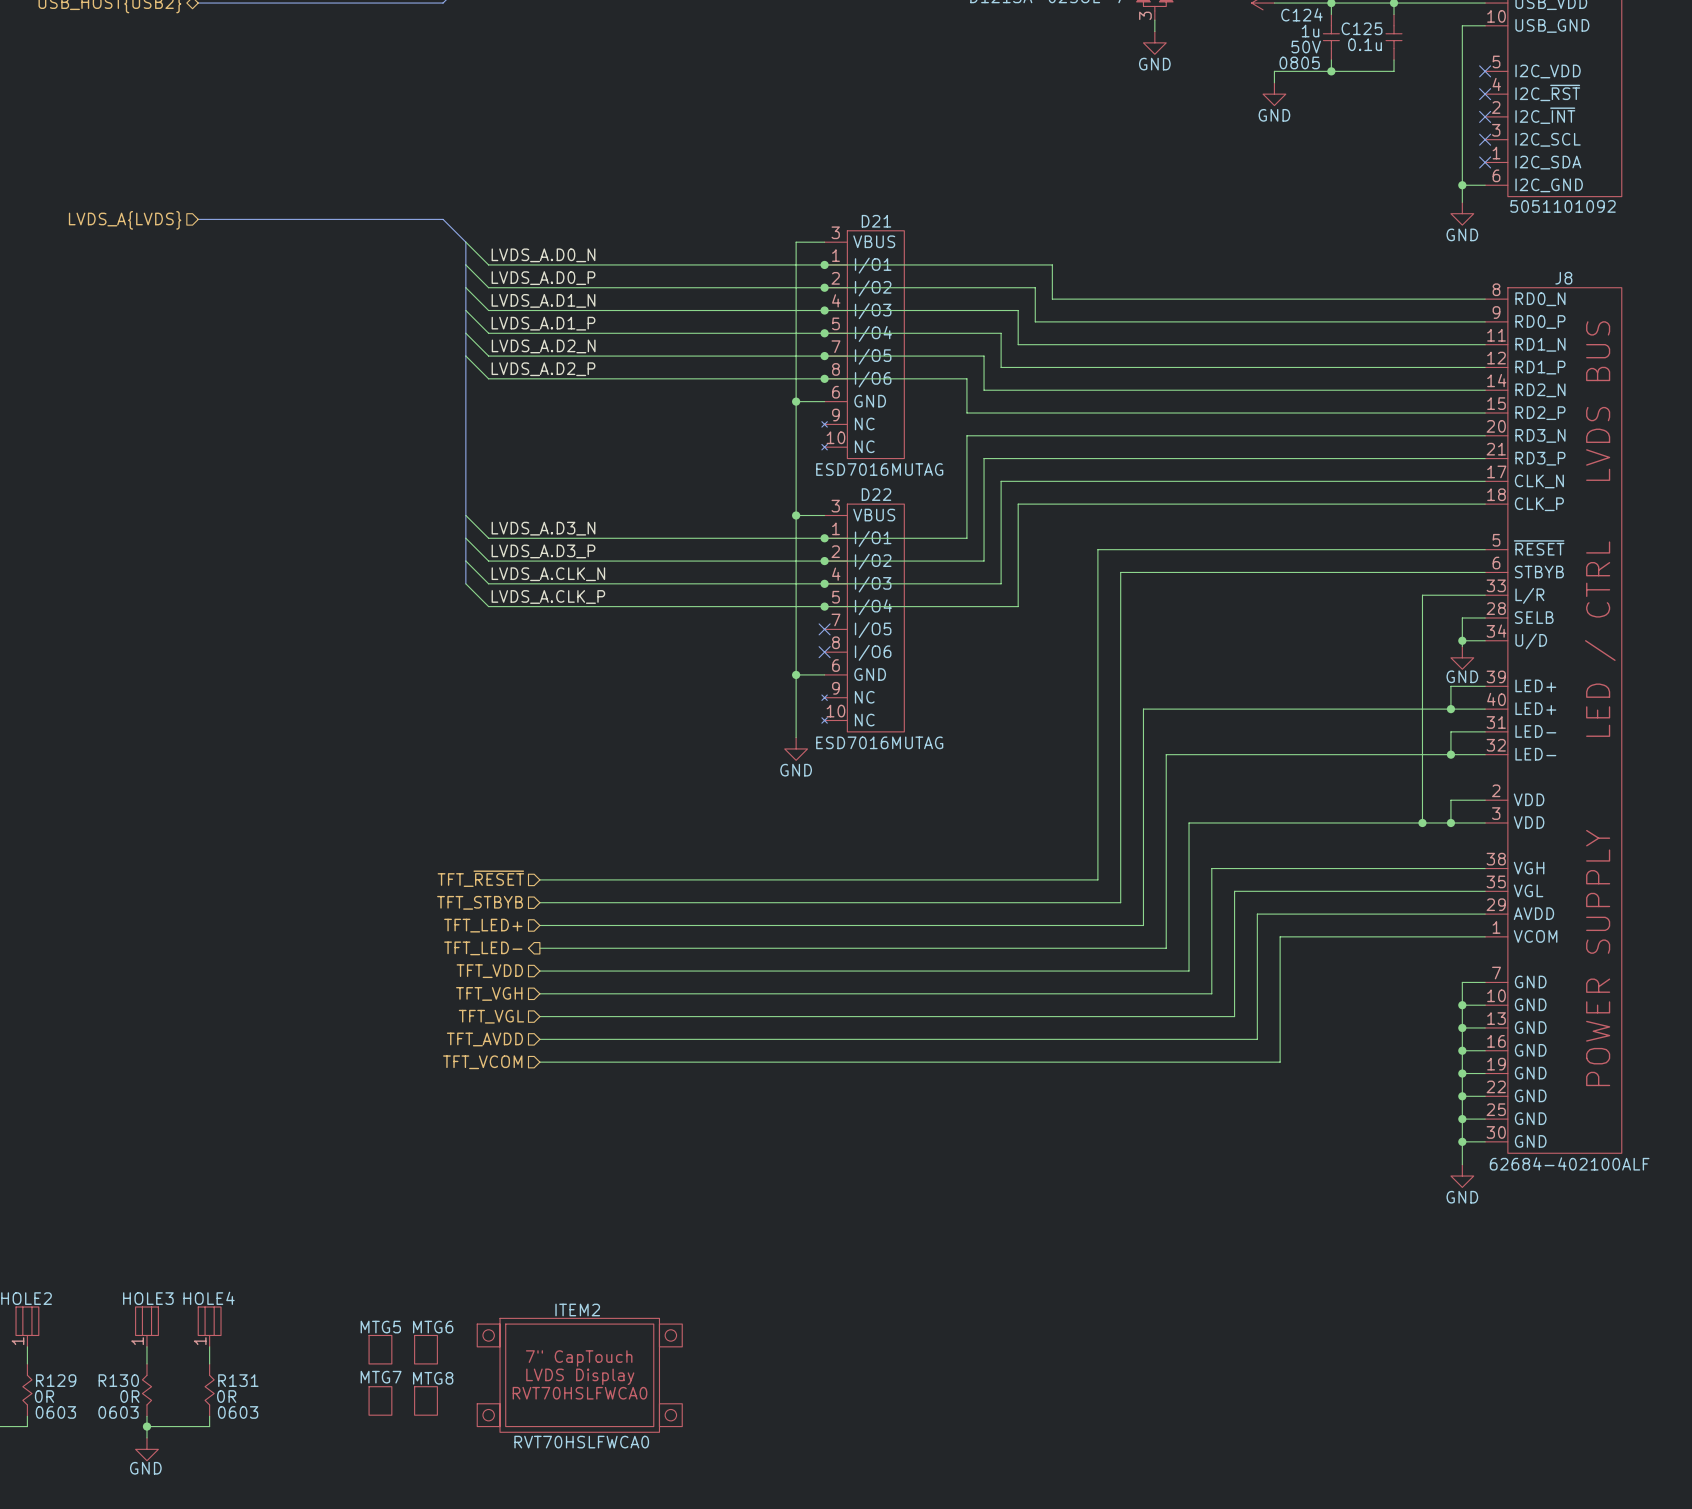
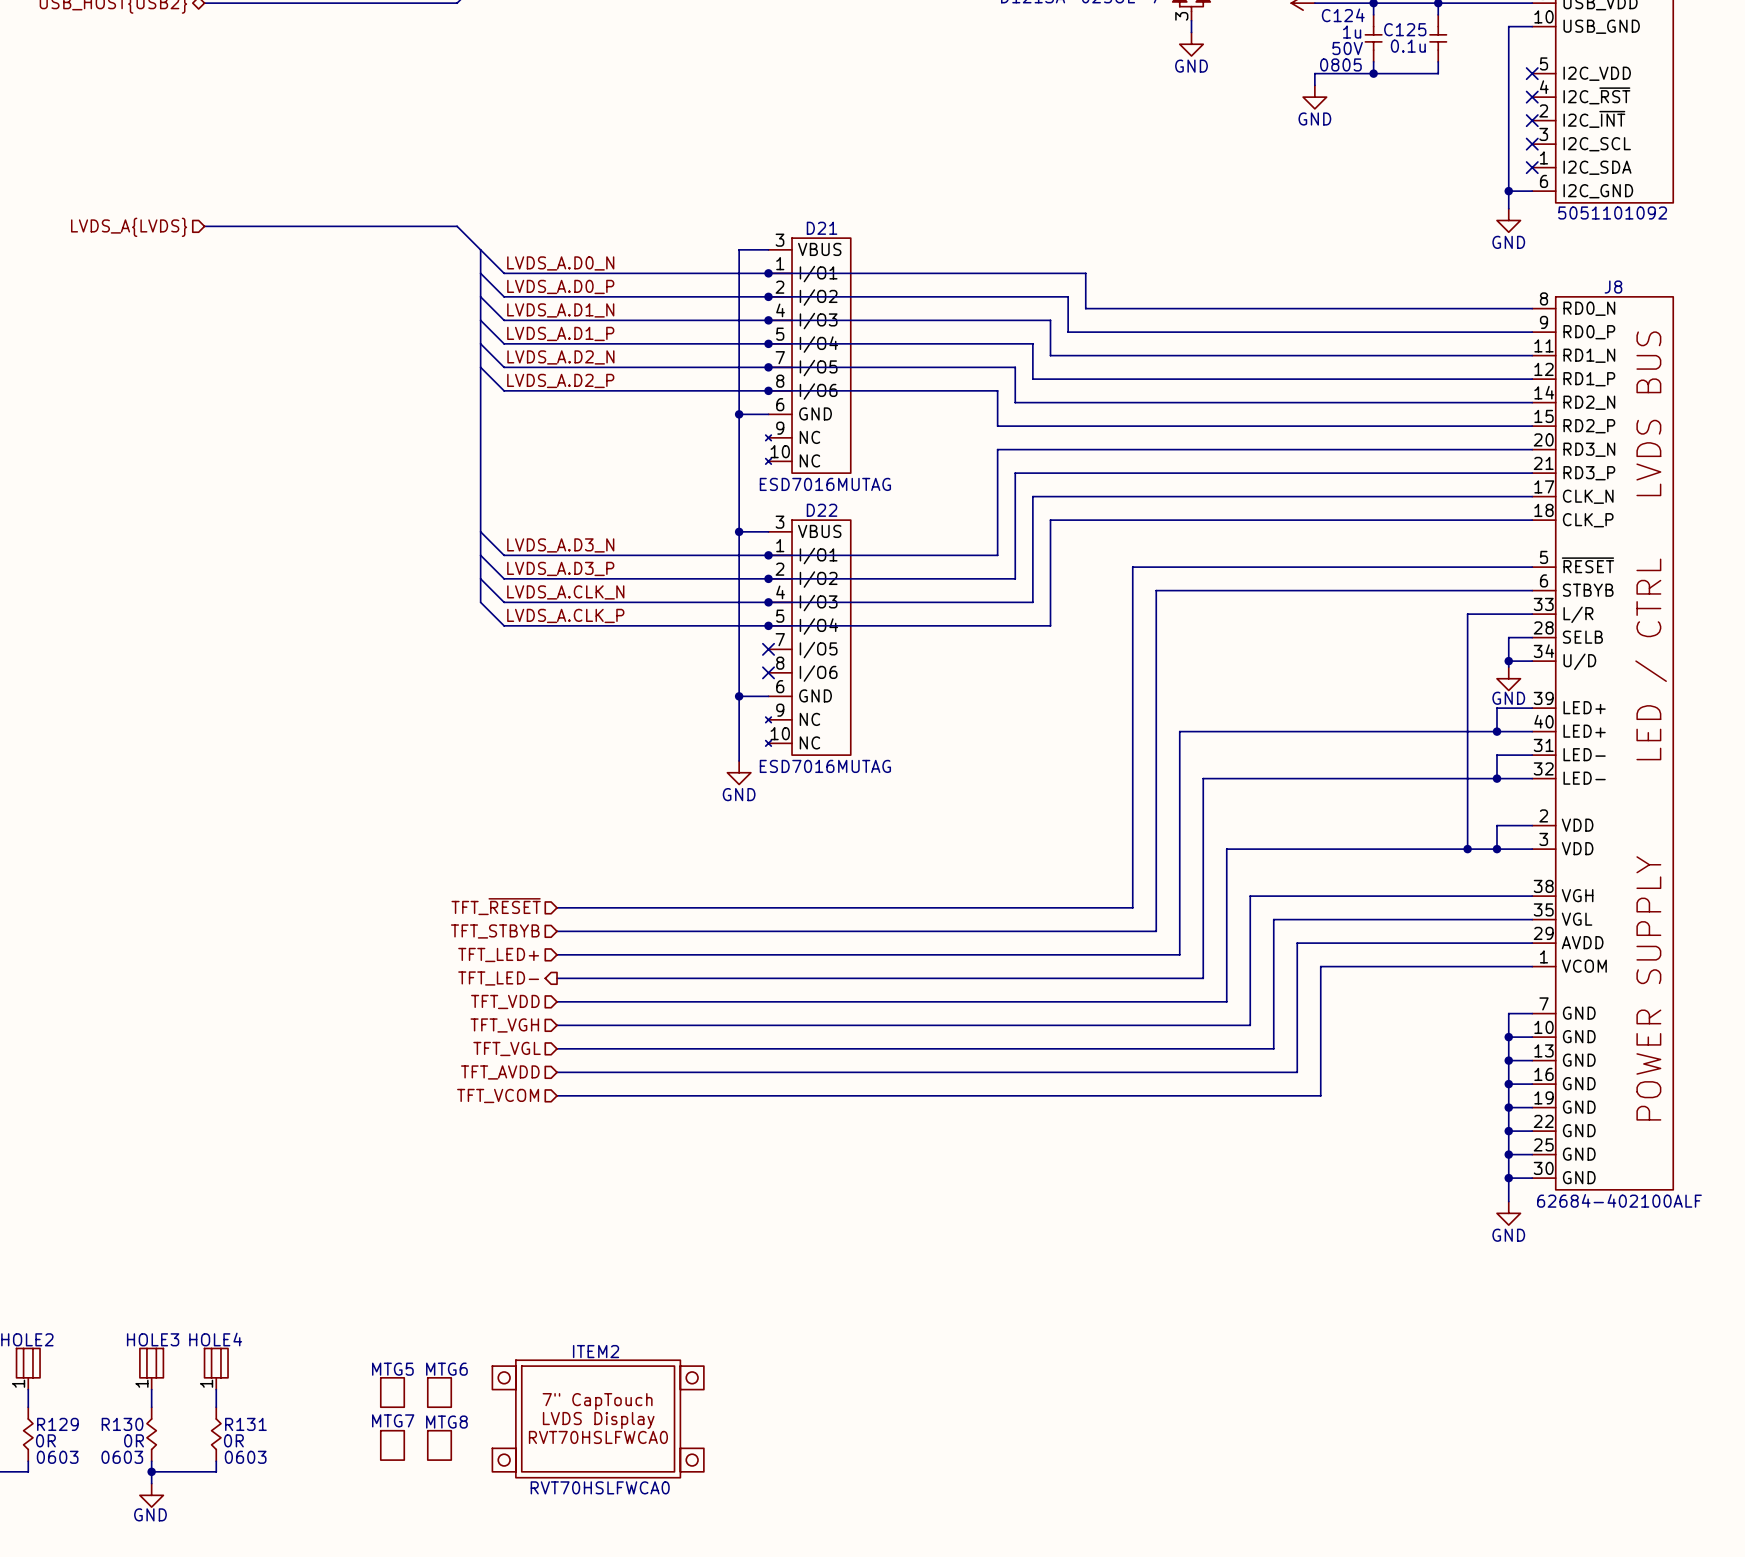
wire: (824, 242) (796, 242) (796, 737) -> (768, 249) (739, 249) (739, 760)
junction: none -> (768, 273)
junction: (824, 264) -> none
junction: none -> (768, 296)
junction: (824, 287) -> none
junction: none -> (768, 320)
junction: (824, 310) -> none
junction: none -> (768, 343)
junction: (824, 333) -> none
D21 position: (863, 344) -> (808, 355)
junction: none -> (768, 367)
junction: (824, 356) -> none
junction: none -> (768, 390)
junction: (824, 378) -> none
junction: none -> (739, 414)
wire: (796, 401) (824, 401) -> (739, 414) (768, 414)
junction: (796, 401) -> none
junction: none -> (739, 531)
wire: (796, 515) (824, 515) -> (739, 531) (768, 531)
junction: (796, 515) -> none
junction: none -> (768, 555)
junction: (824, 538) -> none
junction: none -> (768, 578)
junction: (824, 561) -> none
junction: none -> (768, 602)
junction: (824, 583) -> none
junction: none -> (768, 625)
junction: (824, 606) -> none
D22 position: (863, 618) -> (808, 637)
no-connect mark: none -> (768, 649)
no-connect mark: (824, 629) -> none
no-connect mark: none -> (768, 672)
no-connect mark: (824, 652) -> none
junction: none -> (739, 696)
wire: (796, 674) (824, 674) -> (739, 696) (768, 696)
junction: (796, 674) -> none
power symbol position: GND (796, 748) -> GND (739, 772)

